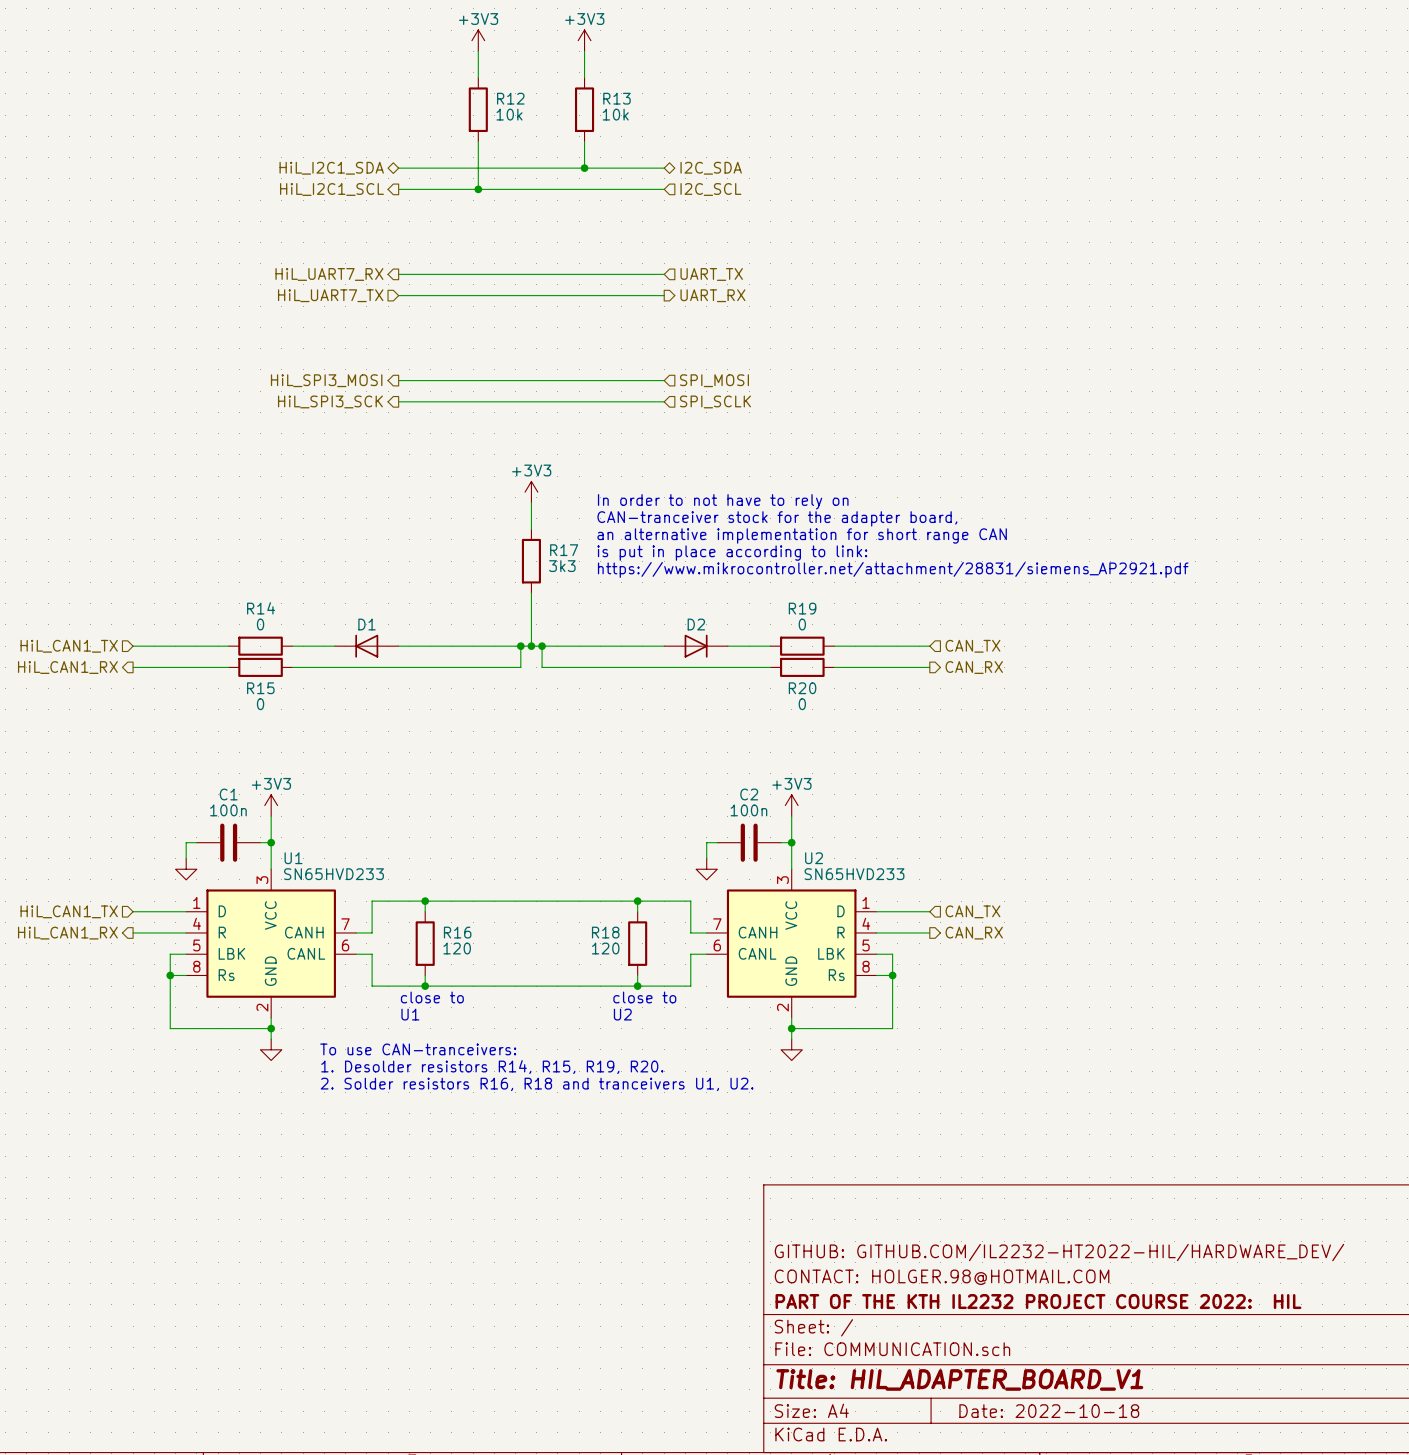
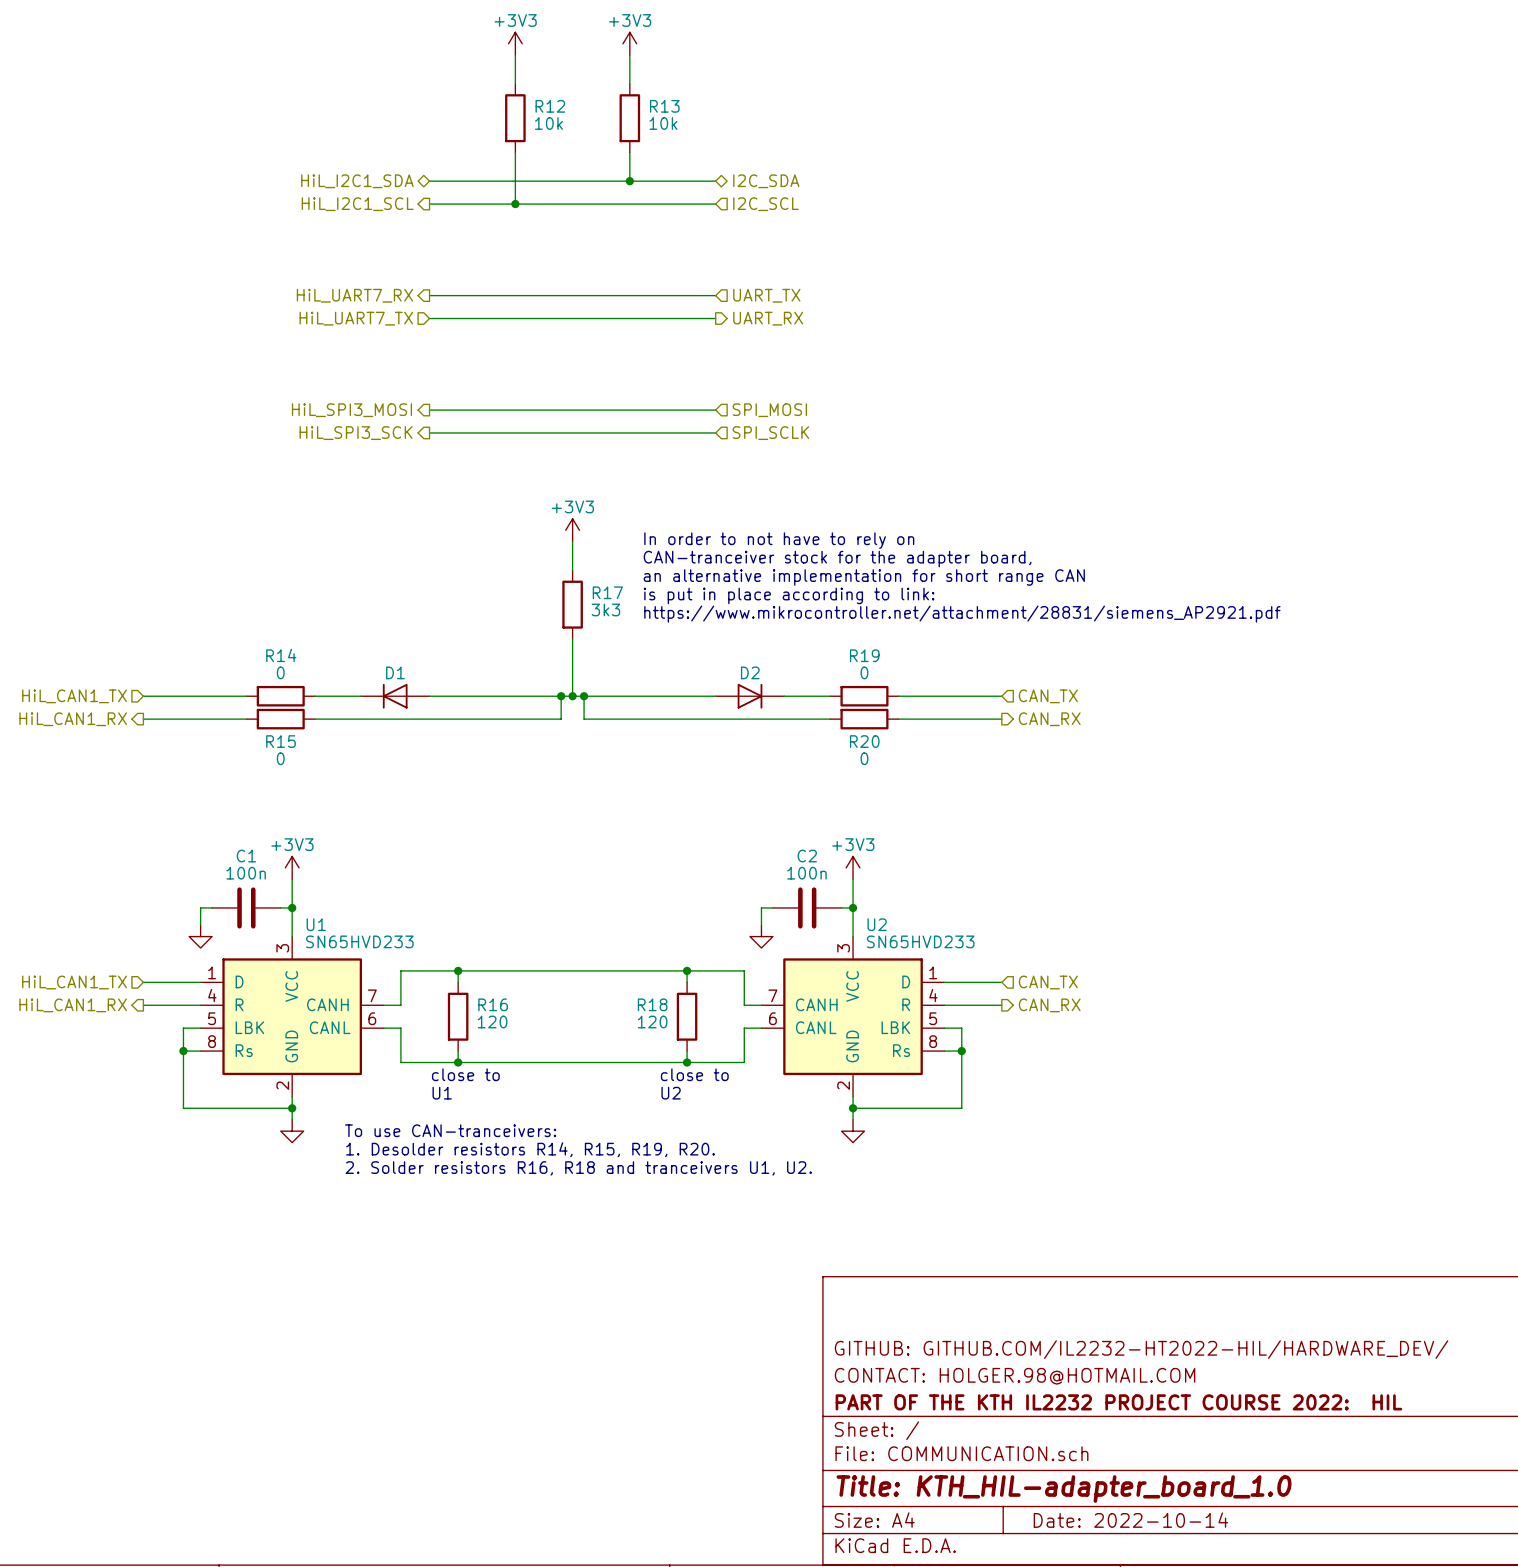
title block: Title: HIL_ADAPTER_BOARD_V1 (959, 1379) -> Title: KTH_HIL-adapter_board_1.0 (1064, 1489)
title block: Date: 2022-10-18 (1049, 1411) -> Date: 2022-10-14 (1130, 1520)

